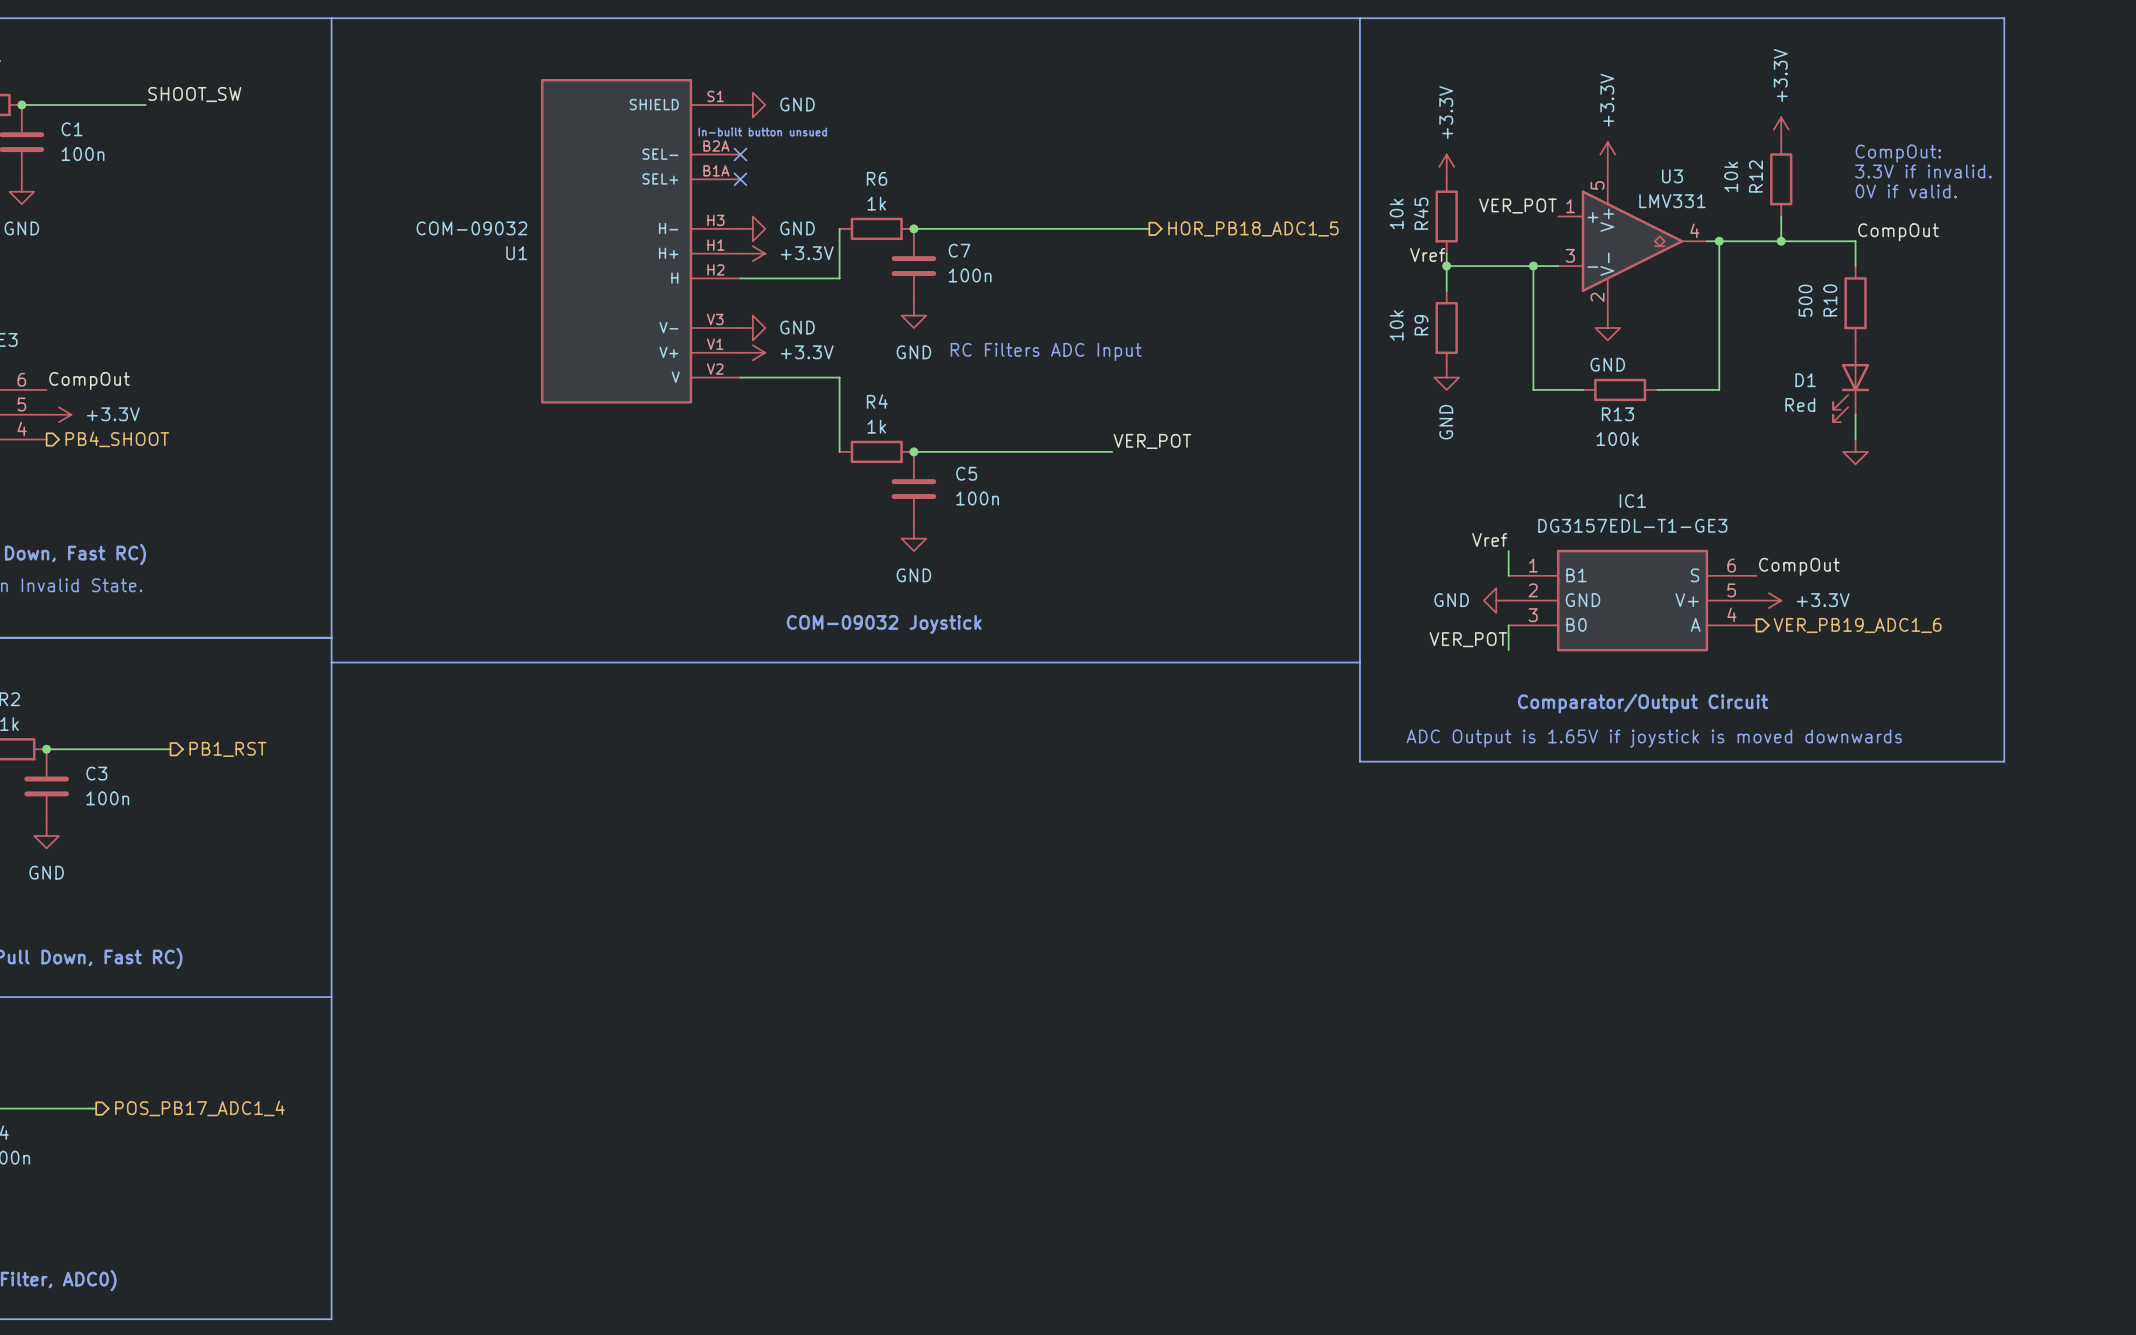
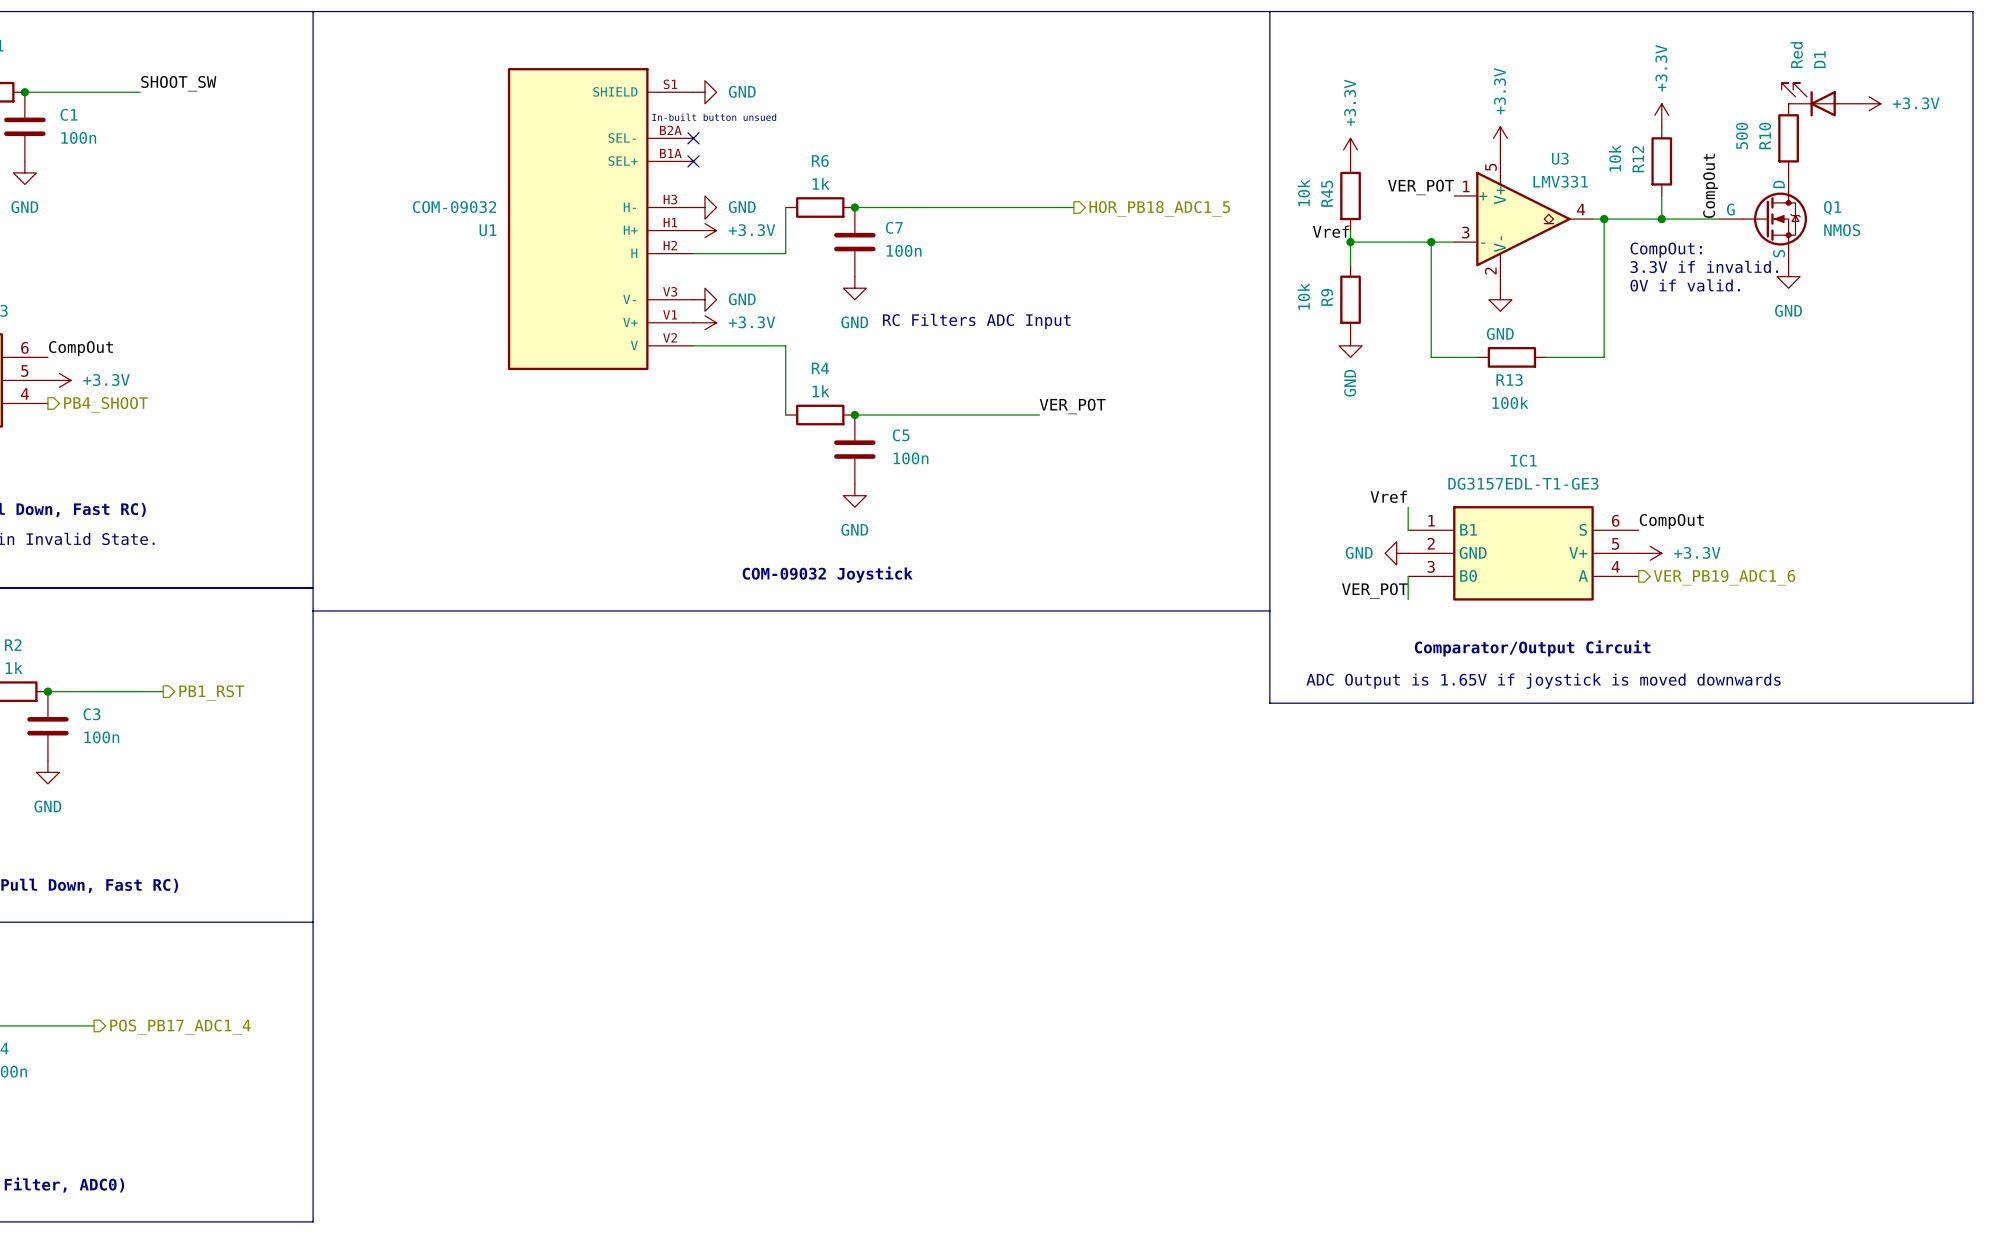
line: (2004, 18) (2004, 761) -> (1869, 11) (1973, 11) (1973, 703) (1869, 703)
power symbol: none -> +3.3V (1869, 103)
text position: CompOut: (1898, 153) -> CompOut: (1666, 250)
text position: 3.3V if invalid. (1923, 171) -> 3.3V if invalid. (1704, 266)
text position: 0V if valid. (1906, 191) -> 0V if valid. (1685, 285)
label rotation: 0° (1898, 232) -> 90° counterclockwise (1710, 185)
wire: (1843, 241) (1855, 241) (1855, 266) -> none
Q1: none -> NMOS (1763, 219)
R10 position: (1855, 303) -> (1788, 138)
power symbol: none -> GND (1788, 276)
D1 position: (1851, 381) -> (1819, 99)
D1 rotation: 0° (1851, 393) -> 90° clockwise (1808, 99)
wire: (1855, 414) (1855, 439) -> none
power symbol: (1855, 451) -> none

